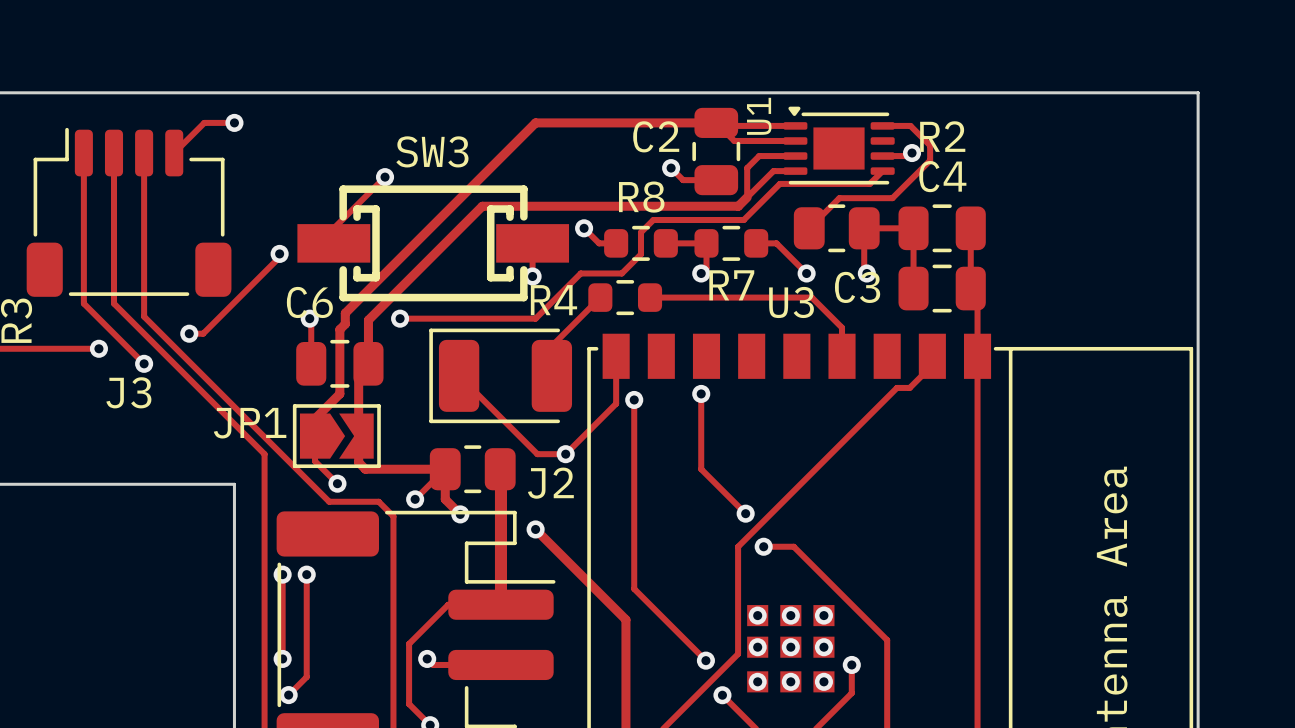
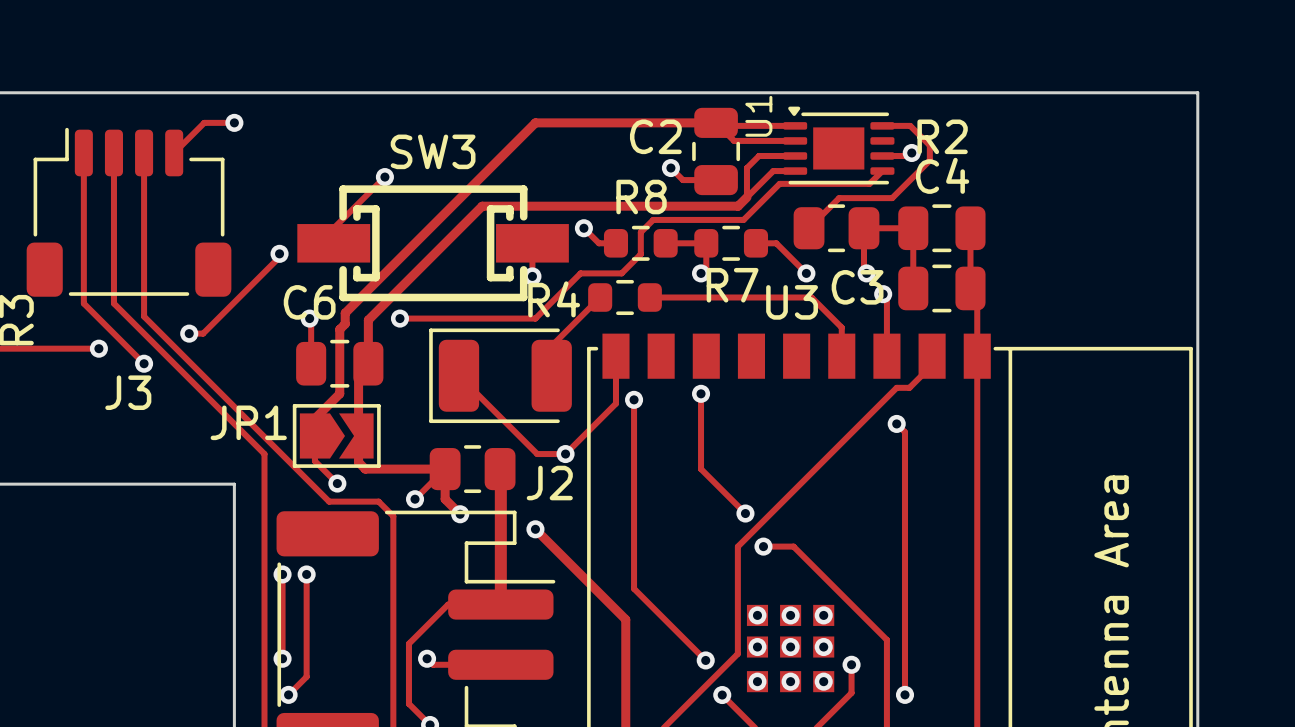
track: none -> (883, 294) (886, 297) (886, 356)
via: none -> (883, 294)
track: none -> (896, 423) (905, 432) (905, 694)
via: none -> (896, 423)
via: none -> (905, 694)

